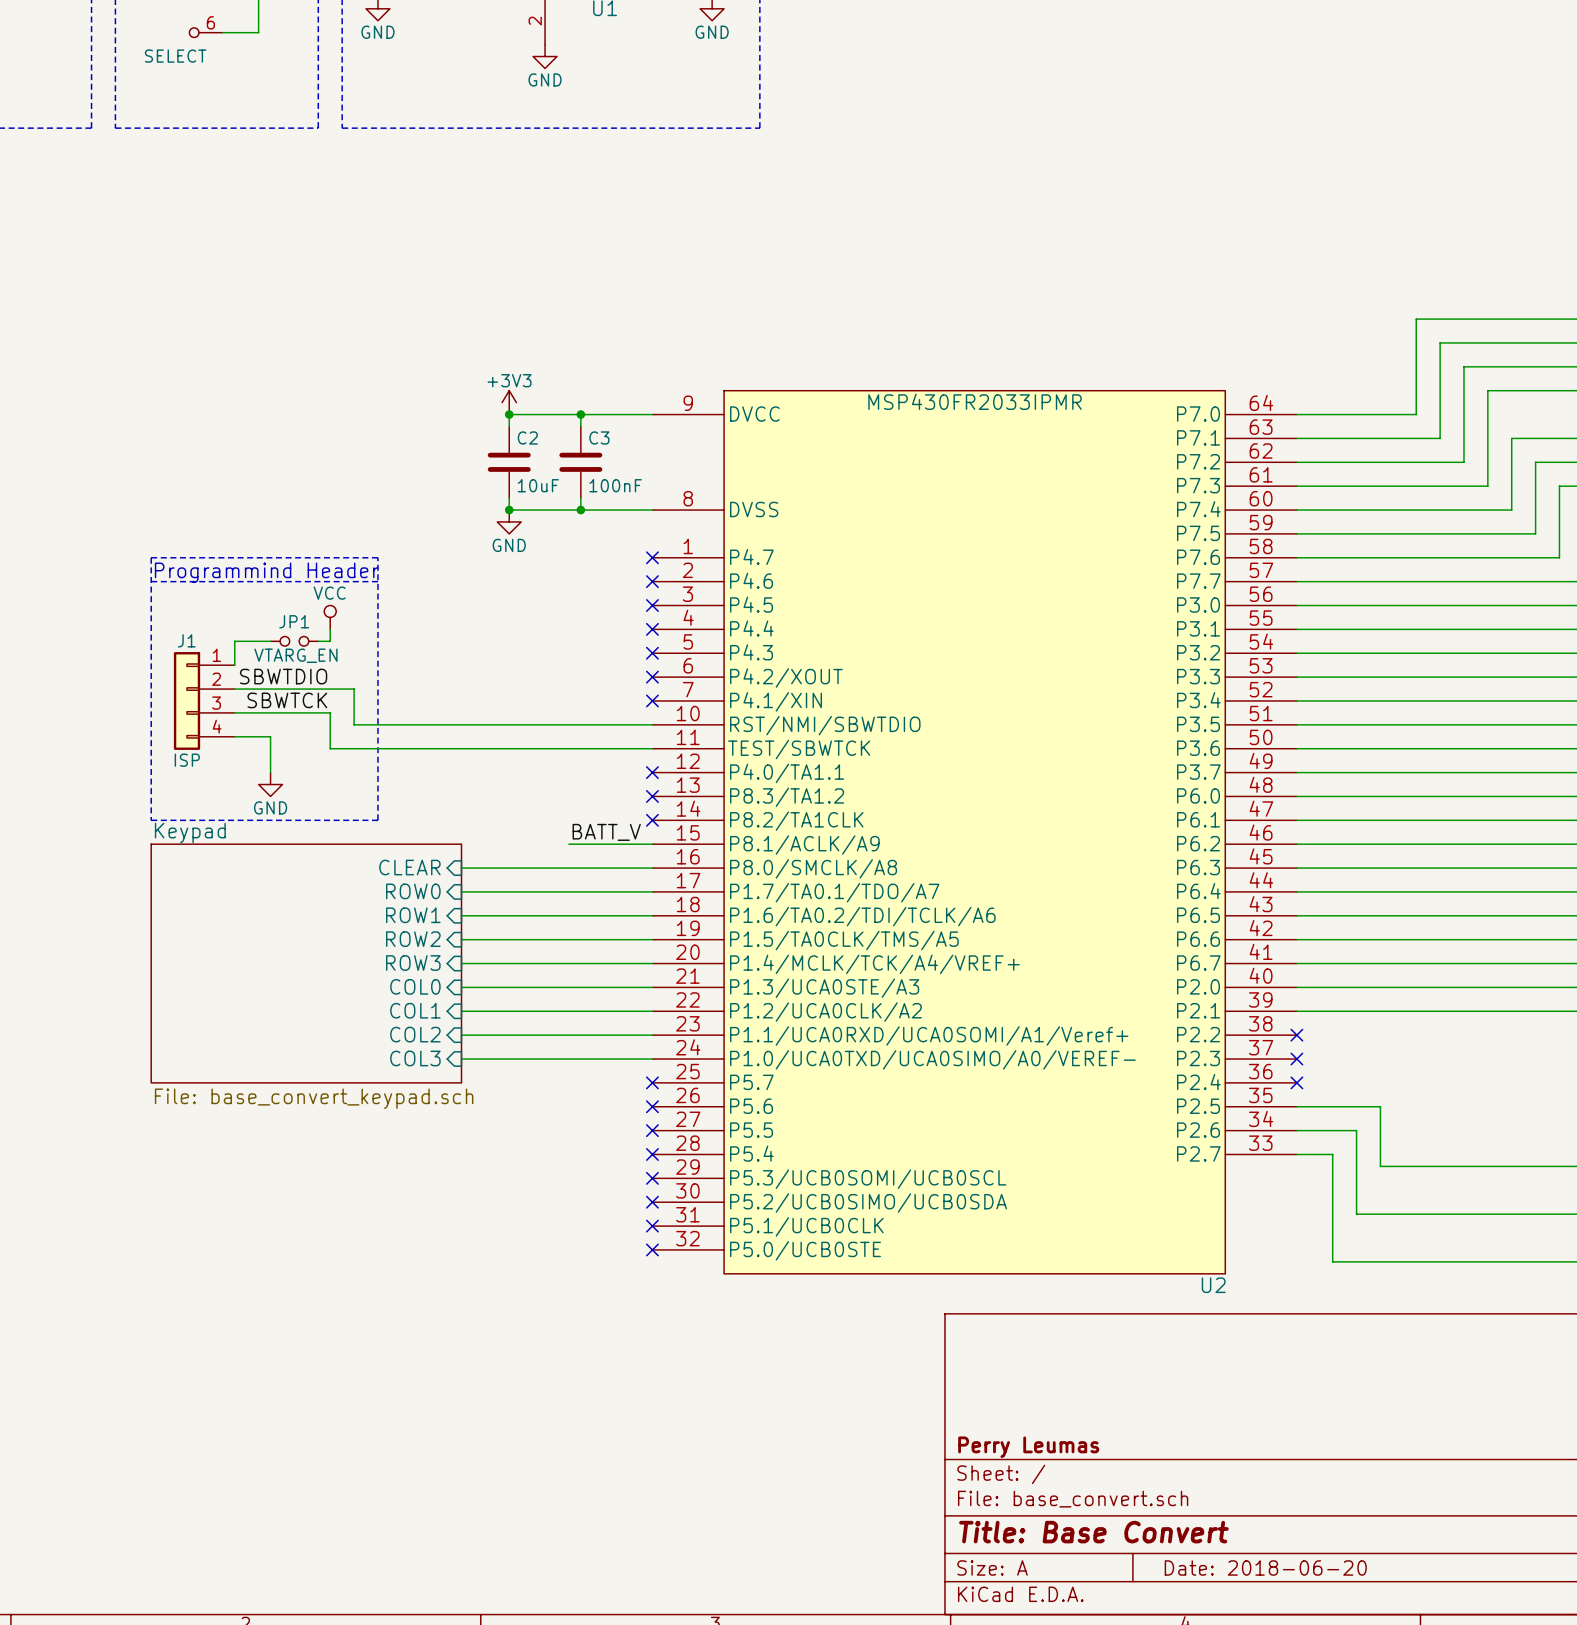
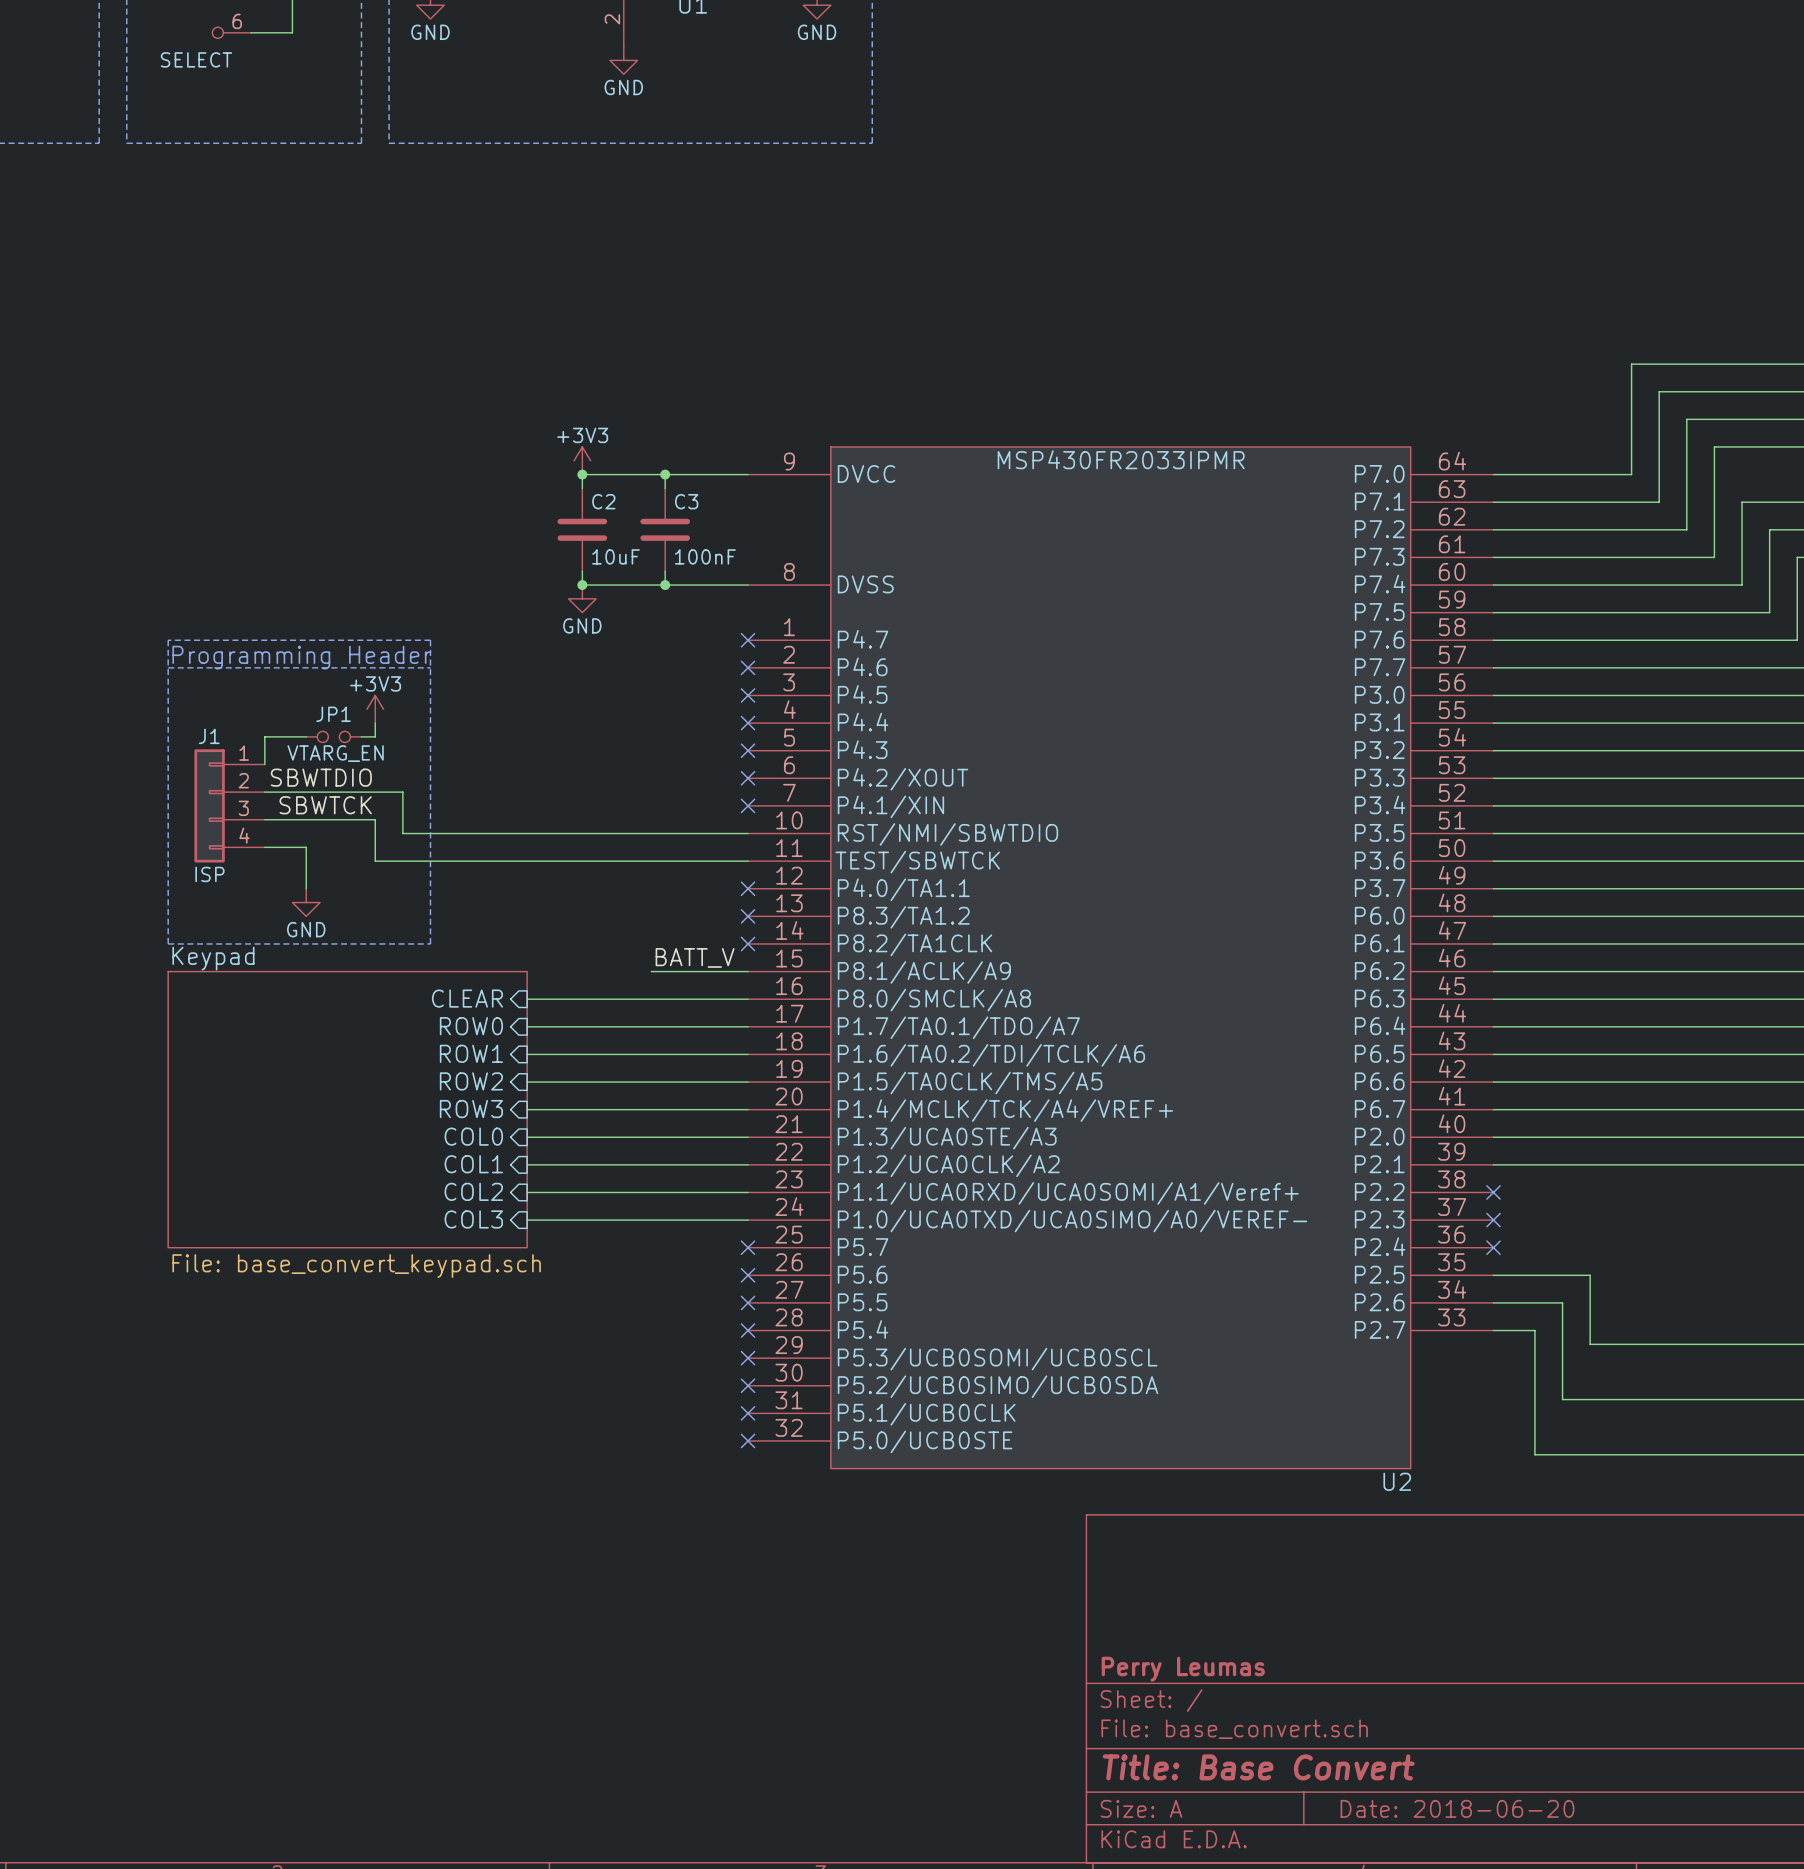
text: Programmind Header (266, 572) -> Programming Header (301, 657)
power symbol: VCC (330, 617) -> +3V3 (375, 709)

